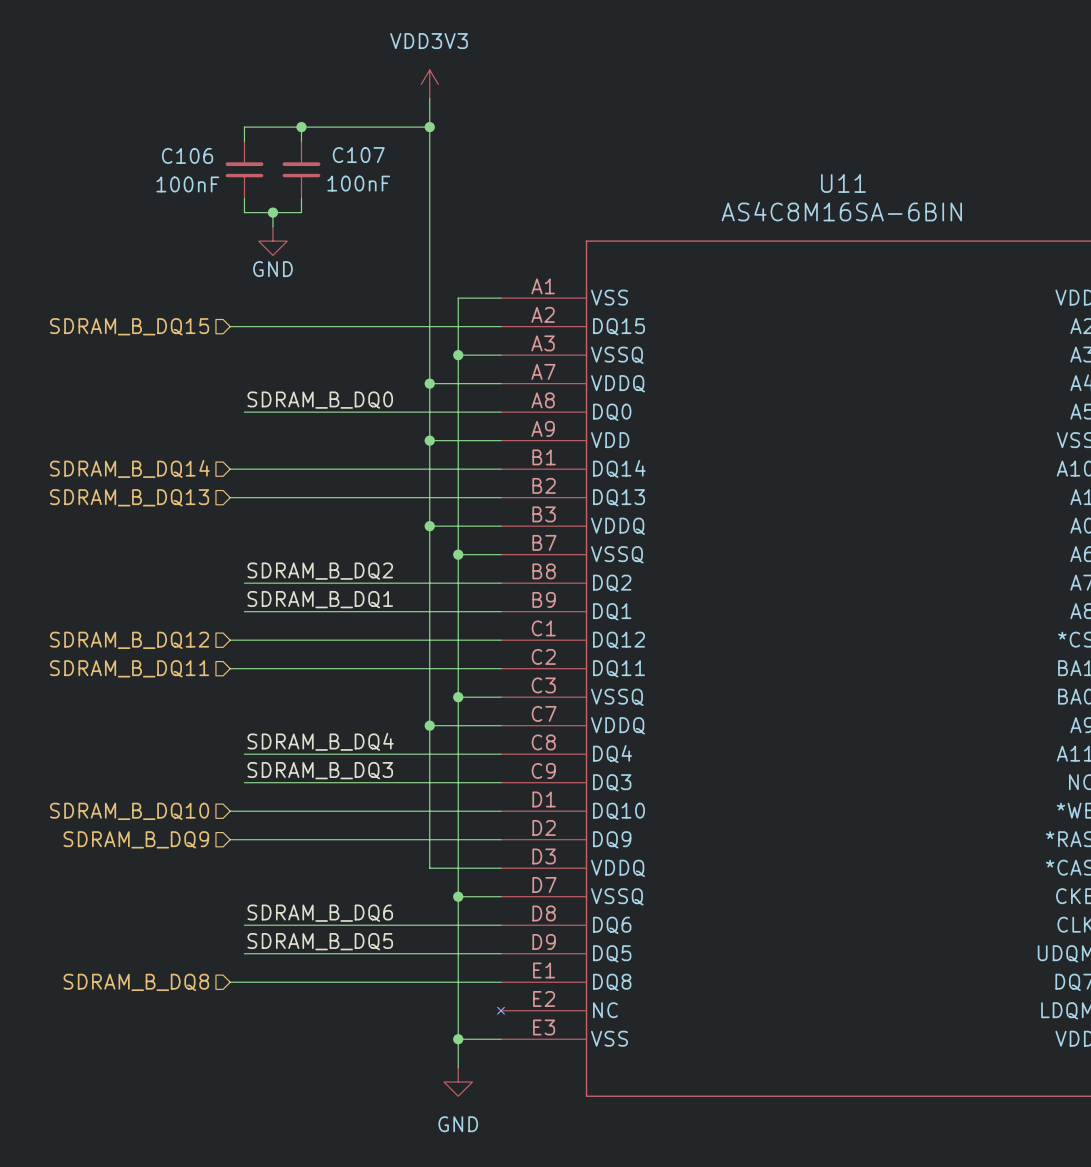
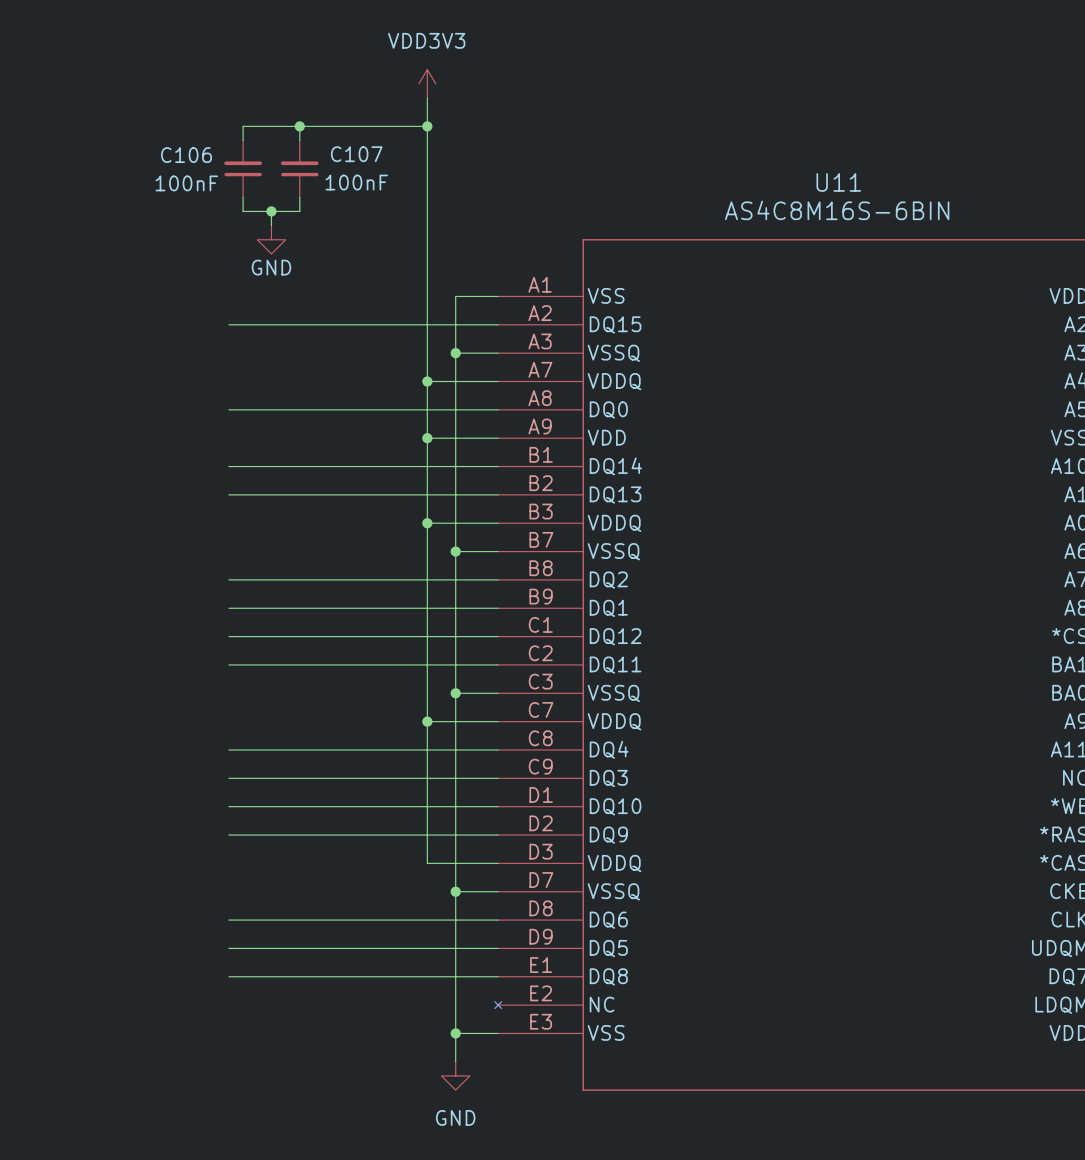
U11 value: AS4C8M16SA-6BIN (841, 211) -> AS4C8M16S-6BIN (837, 210)
hierarchical label: SDRAM_B_DQ15 (129, 326) -> none
label: SDRAM_B_DQ0 (320, 400) -> none
wire: none -> (228, 409) (243, 409)
hierarchical label: SDRAM_B_DQ14 (129, 468) -> none
hierarchical label: SDRAM_B_DQ13 (129, 497) -> none
label: SDRAM_B_DQ2 (320, 571) -> none
wire: none -> (228, 579) (243, 579)
label: SDRAM_B_DQ1 (320, 599) -> none
wire: none -> (228, 608) (243, 608)
hierarchical label: SDRAM_B_DQ12 (129, 640) -> none
hierarchical label: SDRAM_B_DQ11 (129, 668) -> none
label: SDRAM_B_DQ4 (320, 741) -> none
wire: none -> (228, 749) (243, 749)
label: SDRAM_B_DQ3 (320, 770) -> none
wire: none -> (228, 778) (243, 778)
hierarchical label: SDRAM_B_DQ10 (129, 811) -> none
hierarchical label: SDRAM_B_DQ9 (136, 839) -> none
label: SDRAM_B_DQ6 (320, 913) -> none
wire: none -> (228, 920) (243, 920)
label: SDRAM_B_DQ5 (320, 941) -> none
wire: none -> (228, 948) (243, 948)
hierarchical label: SDRAM_B_DQ8 (136, 982) -> none

